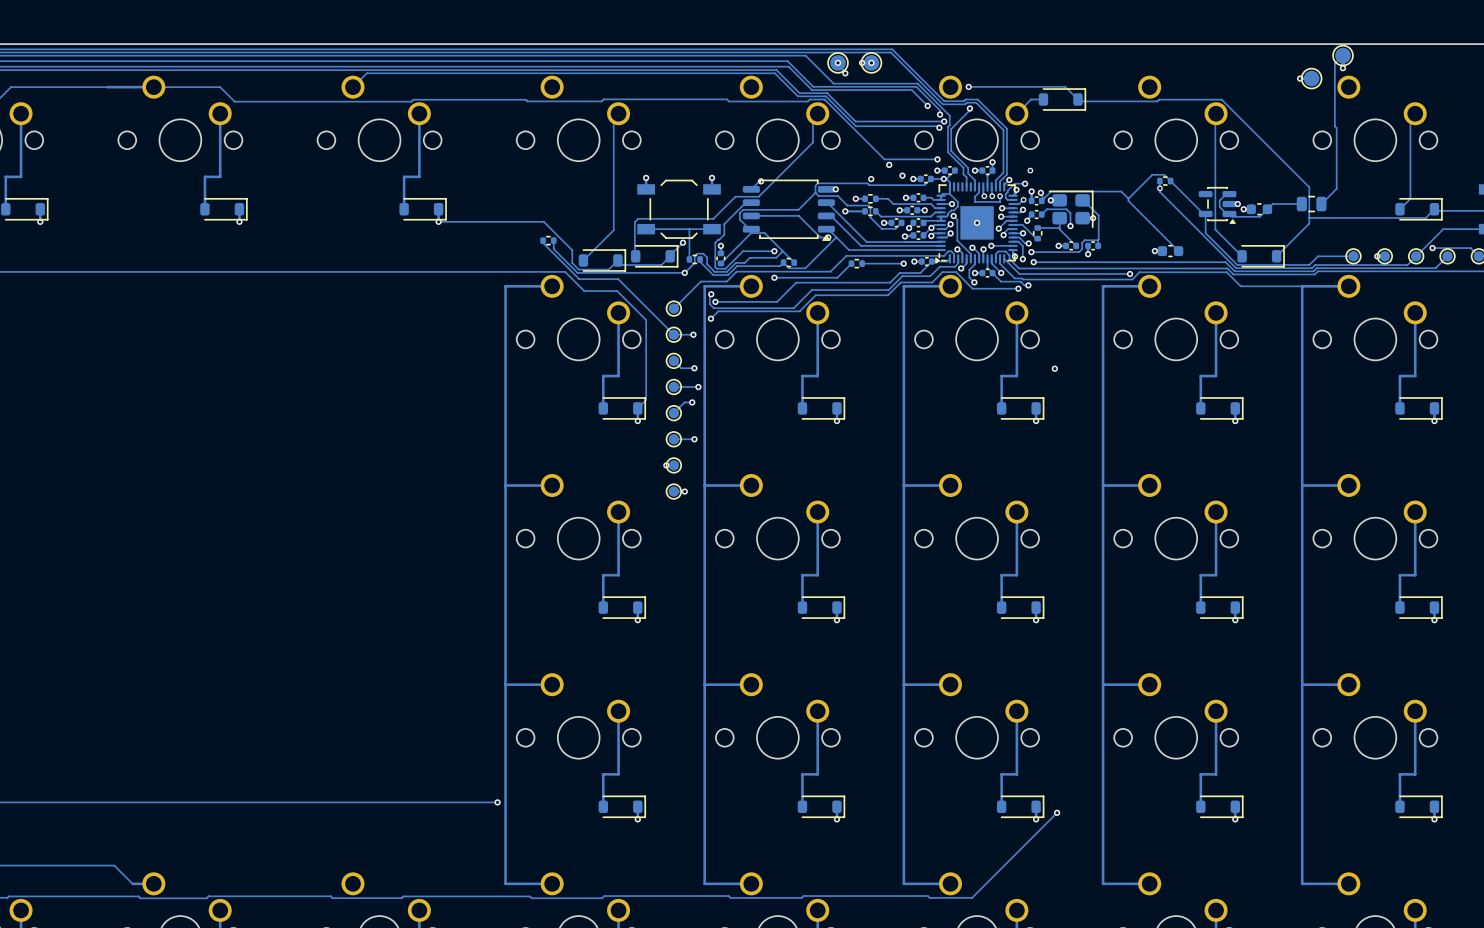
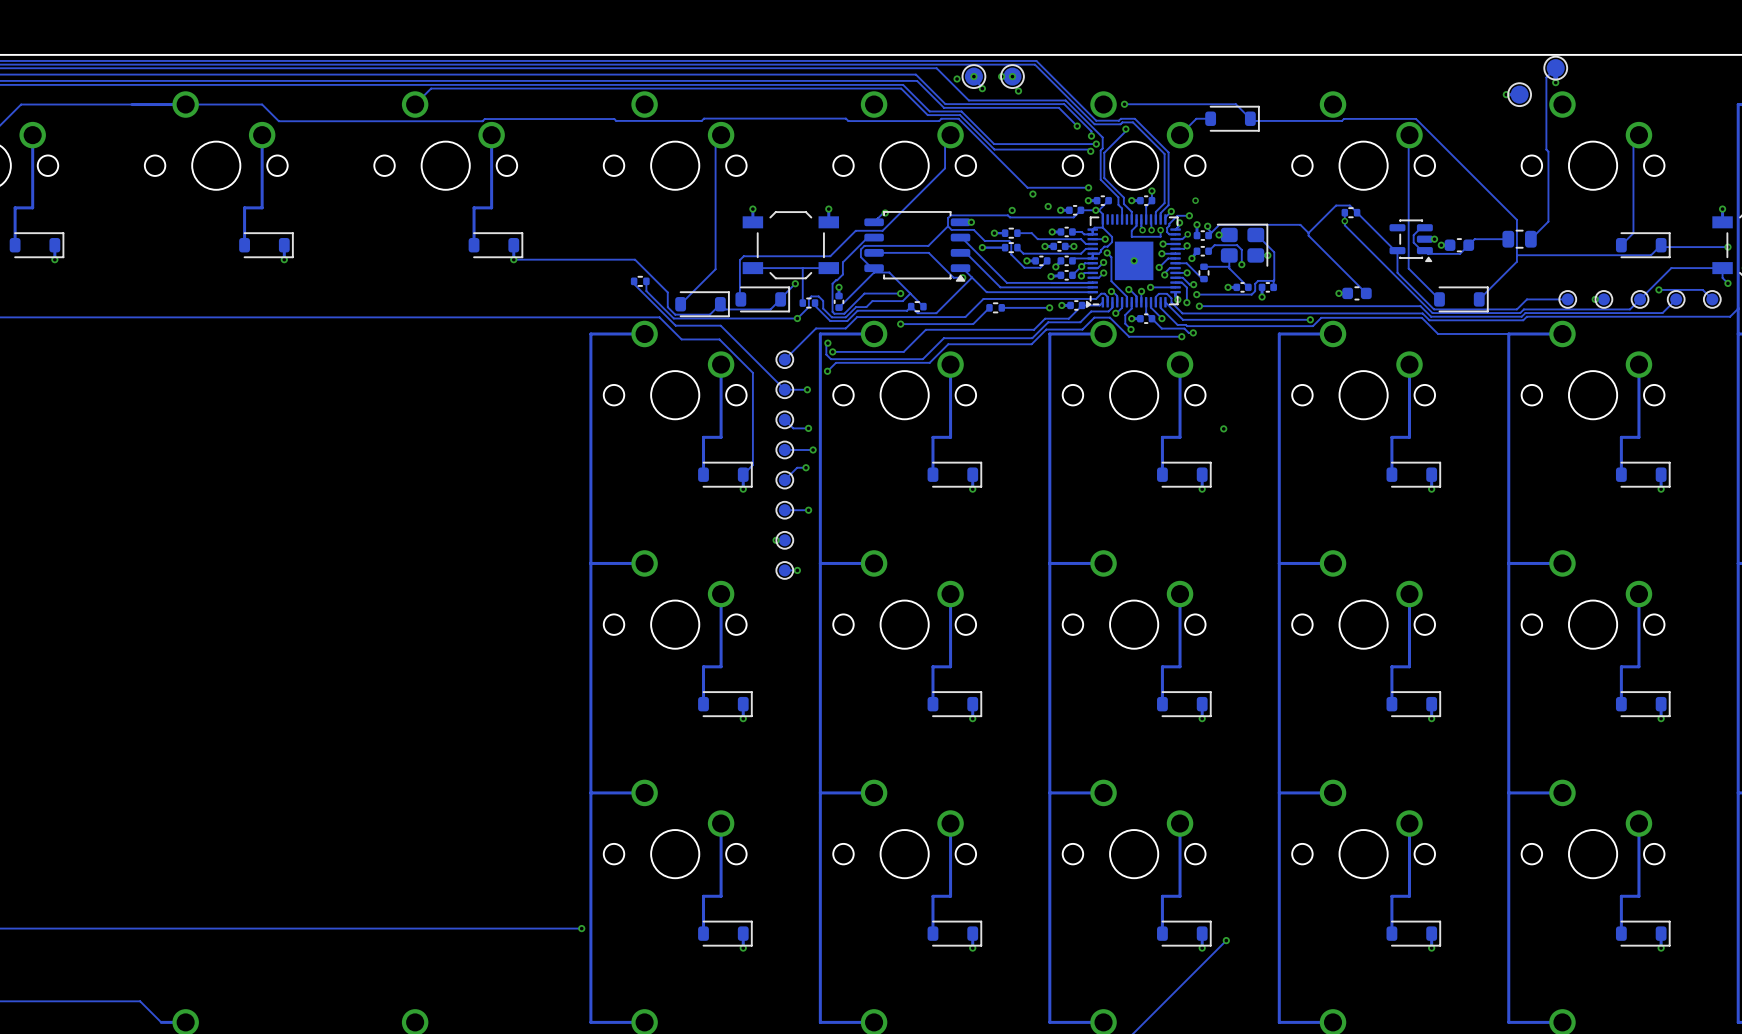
via: none -> (957, 78)
via: none -> (1018, 91)

